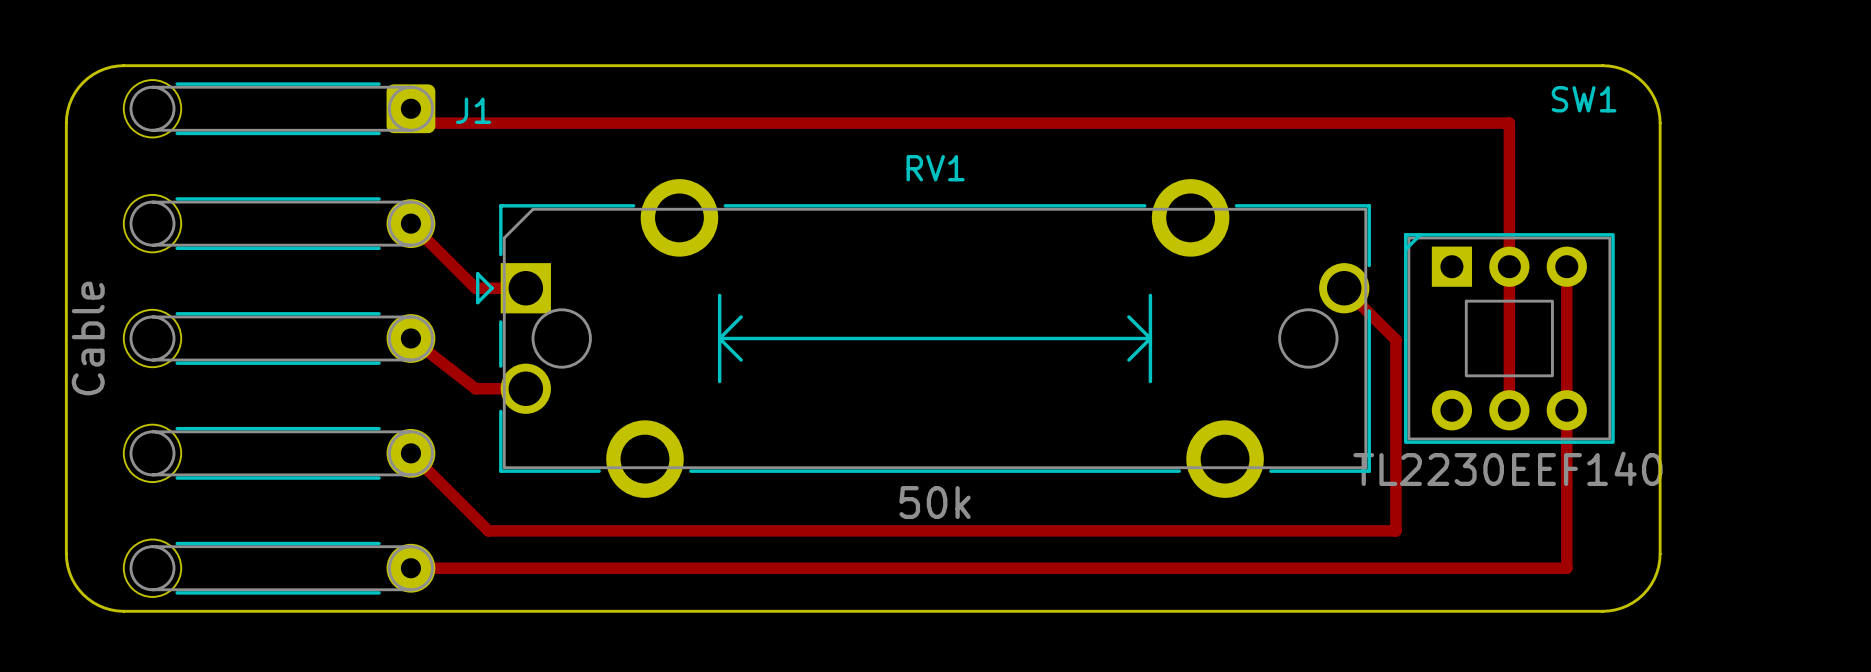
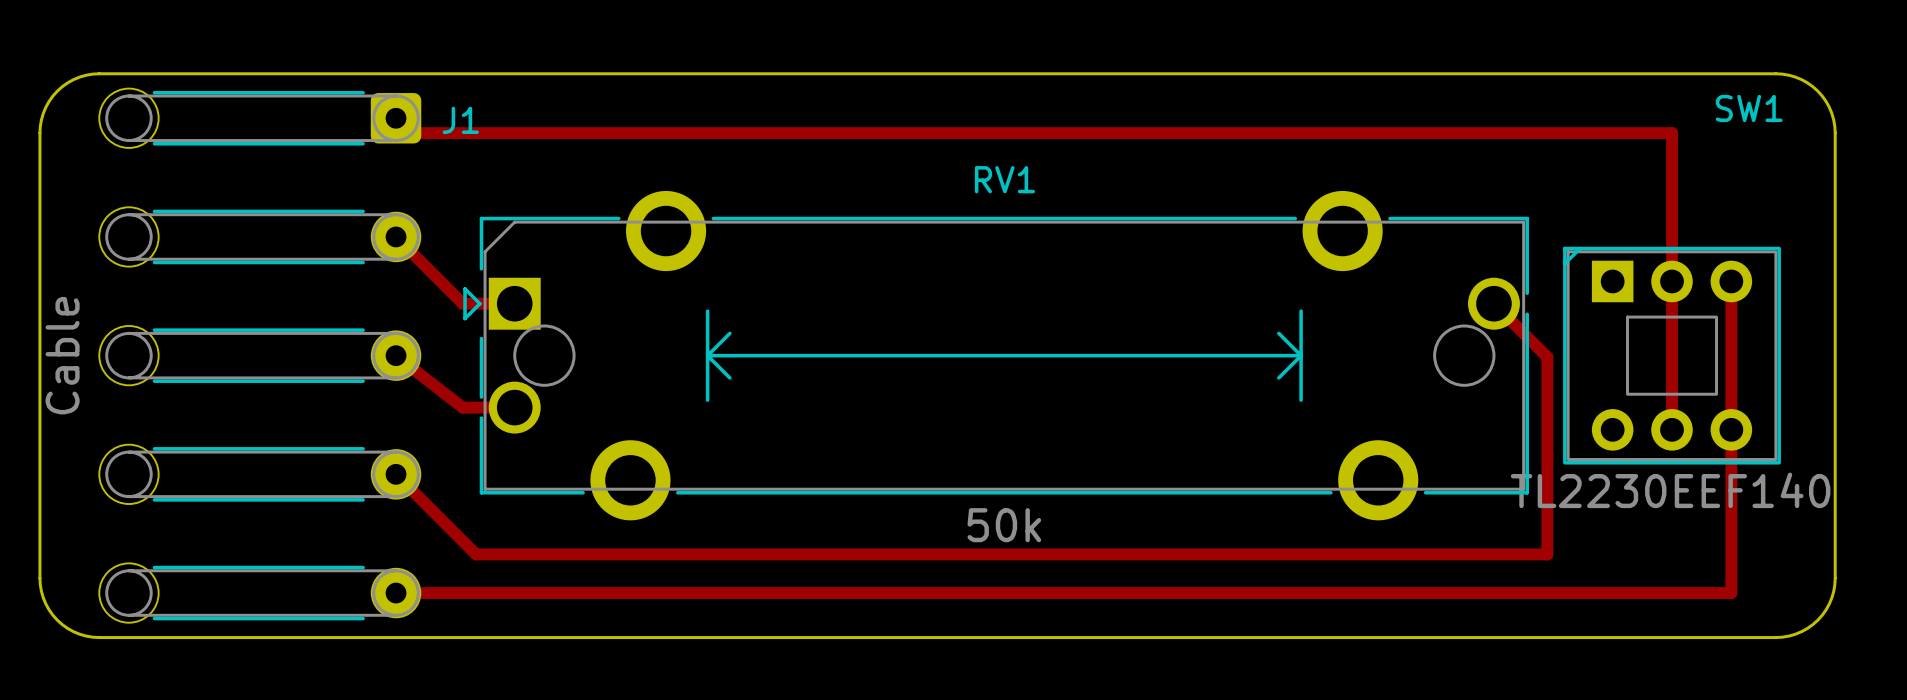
board edge: (1602, 65) (1627, 71) (1643, 82) (1654, 98) (1660, 123) (1659, 560) (1654, 578) (1643, 594) (1627, 605) (1602, 611) -> (1627, 73) (1789, 75) (1807, 82) (1822, 96) (1831, 113) (1835, 133) (1835, 578) (1831, 597) (1822, 615) (1812, 624) (1789, 636) (1627, 637)
track: (1509, 123) (1509, 410) -> (1531, 133) (1672, 133) (1672, 429)
RV1 footprint: [475, 179, 1371, 498] -> [463, 190, 1529, 521]
track: (1566, 266) (1566, 568) -> (1731, 281) (1731, 593) (1590, 593)
track: (1344, 288) (1395, 339) (1395, 530) -> (1493, 303) (1547, 357) (1547, 554) (1413, 554)
SW1 position: (1509, 338) -> (1672, 355)

